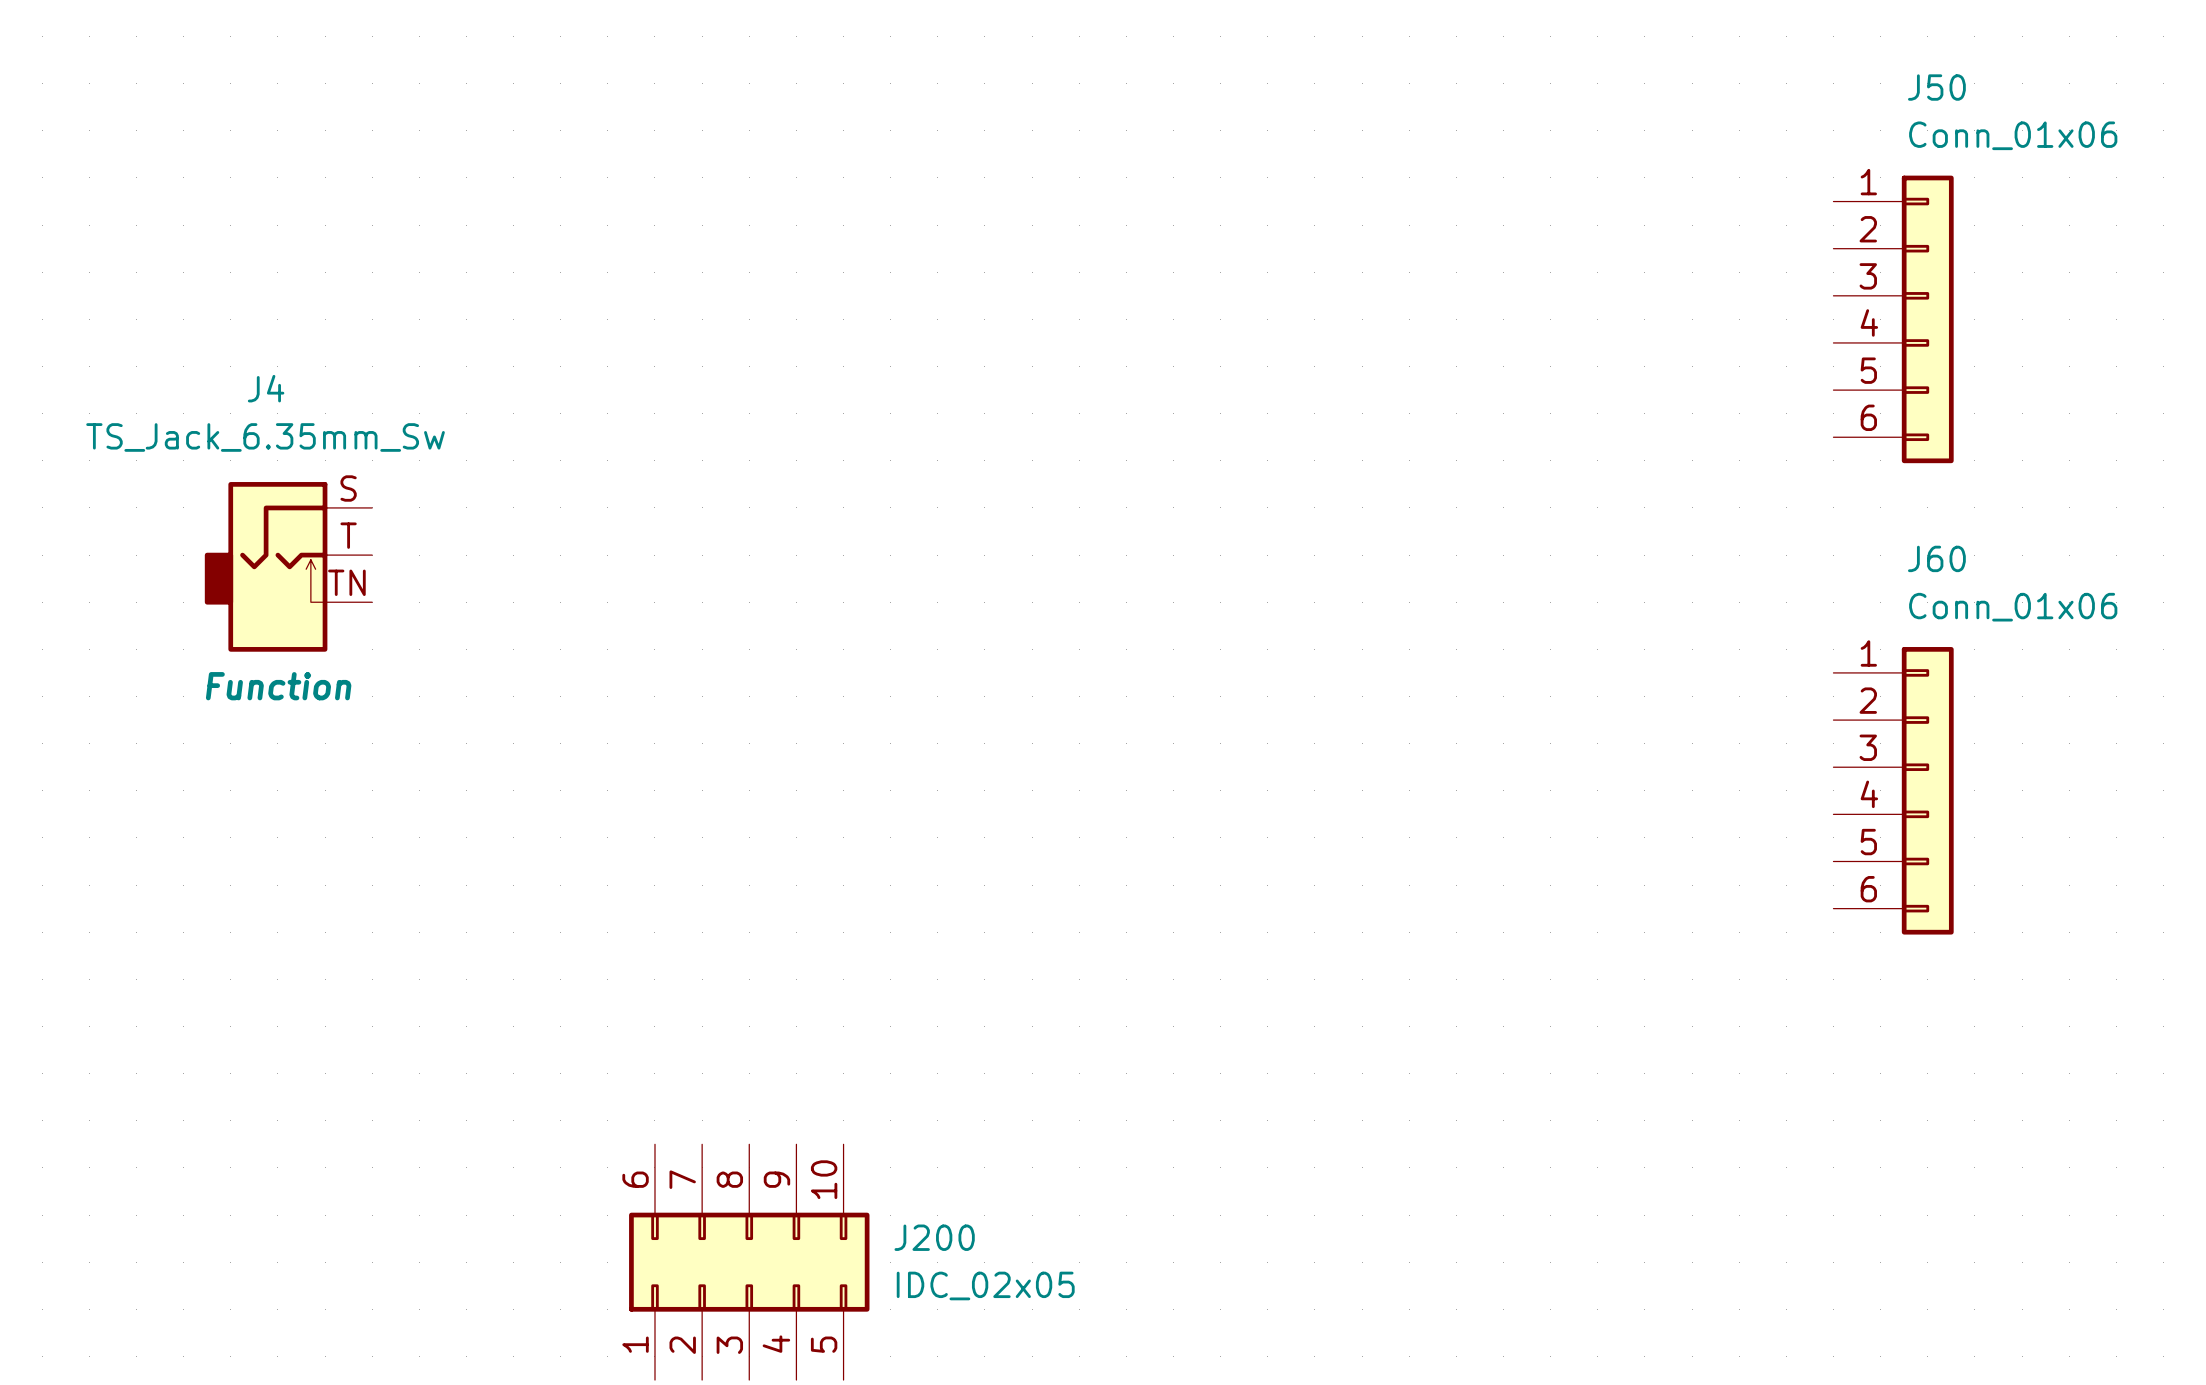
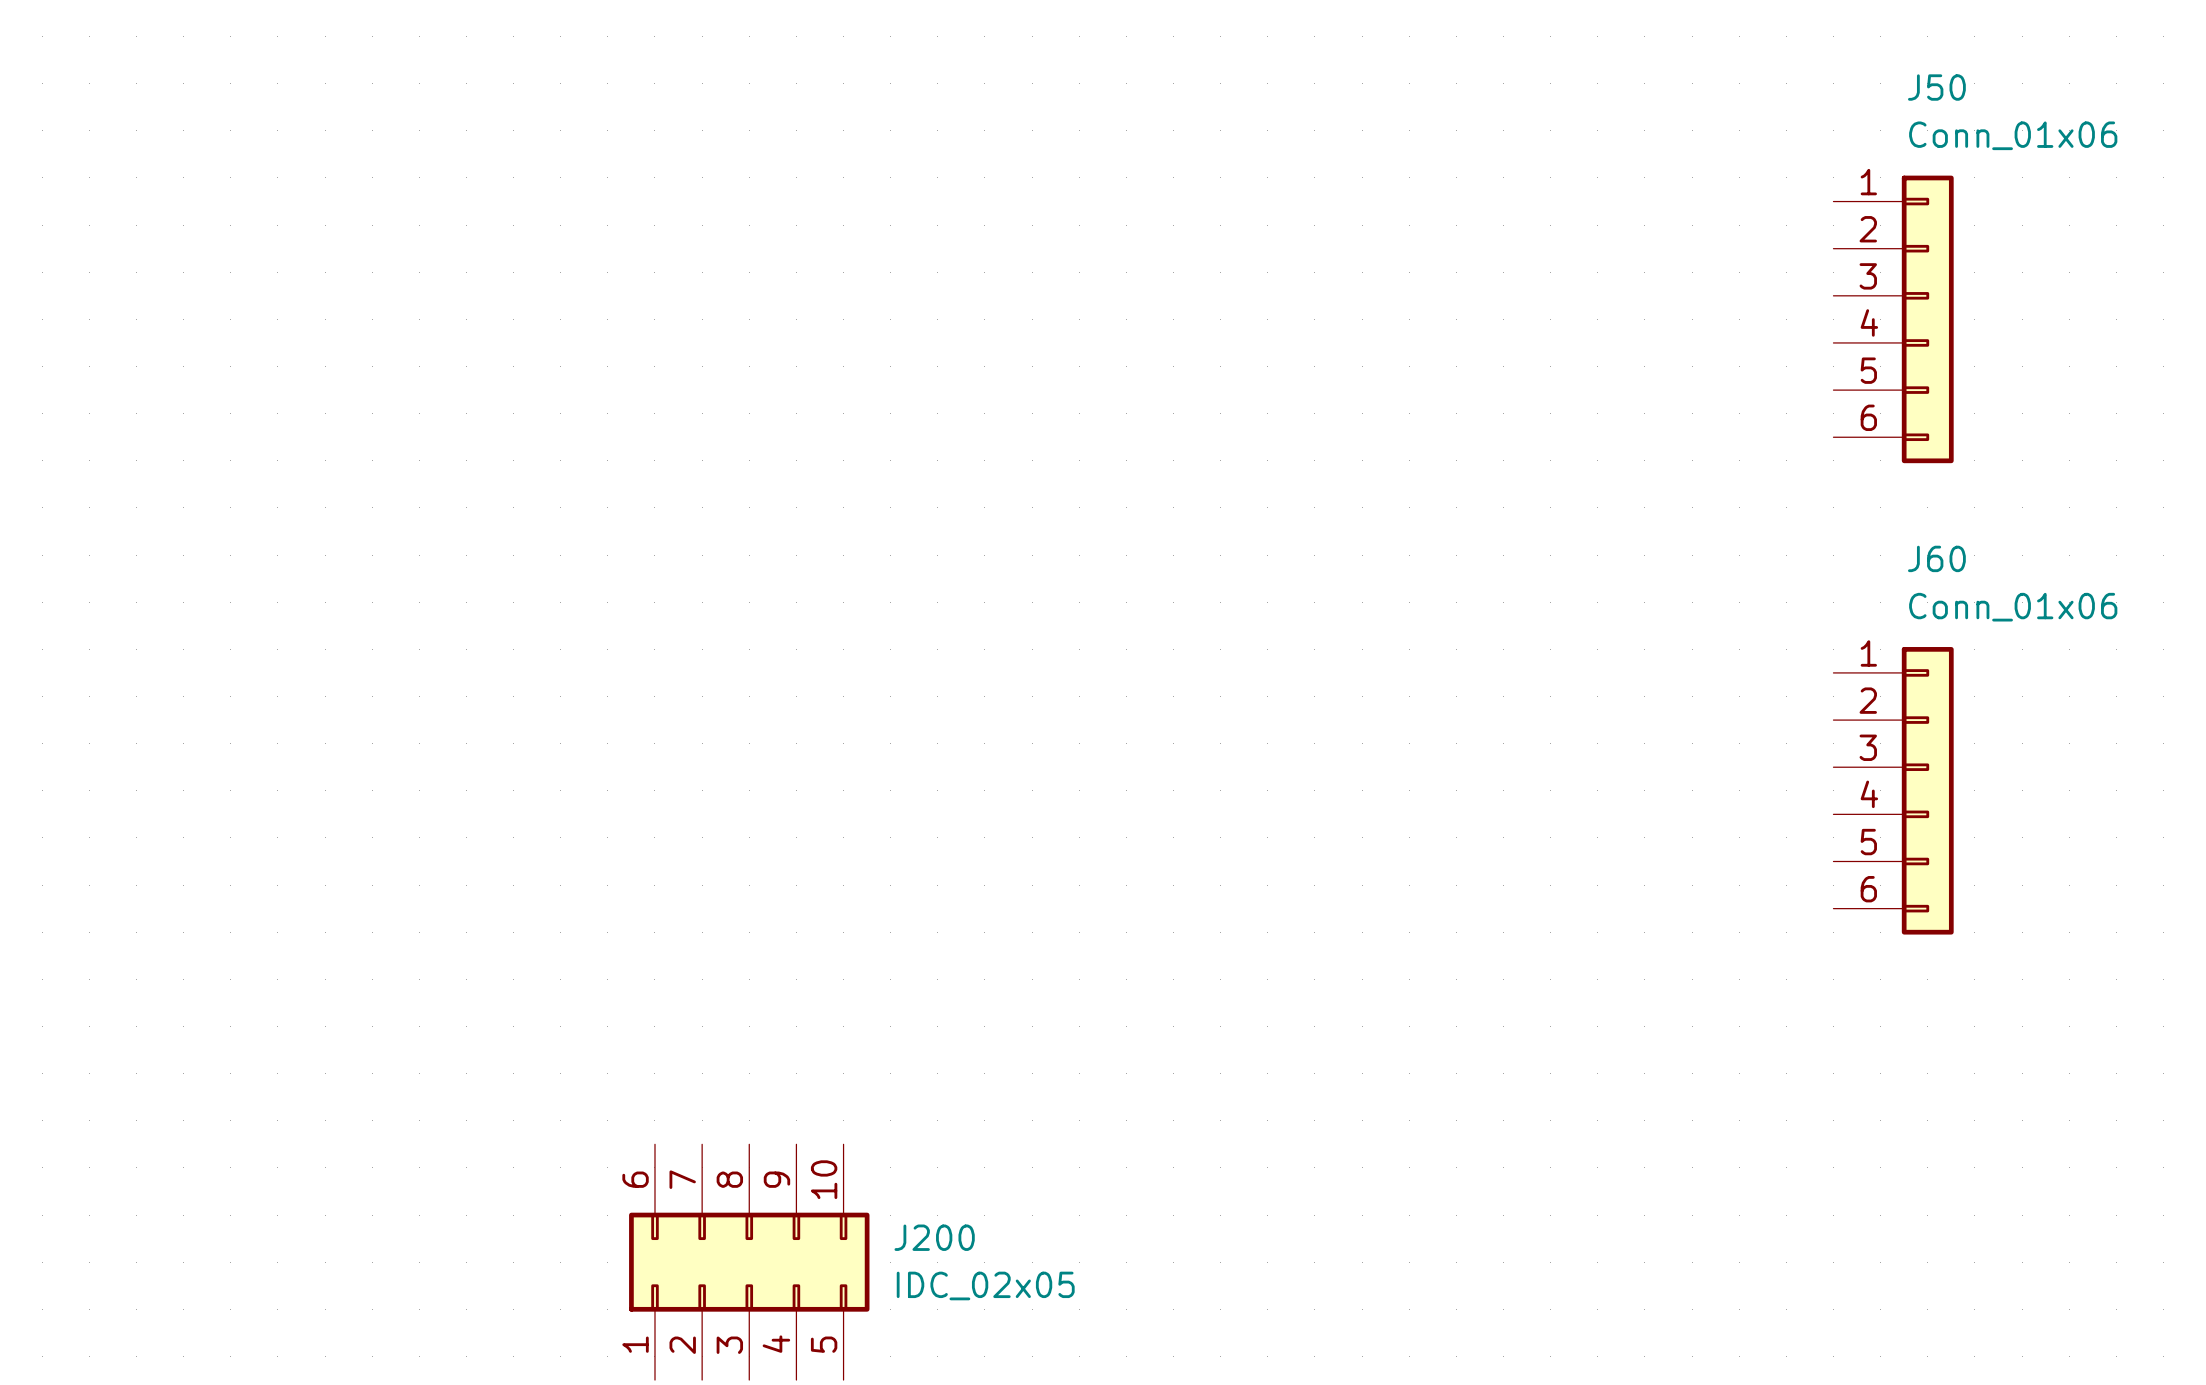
J4: TS_Jack_6.35mm_Sw (288, 566) -> none

